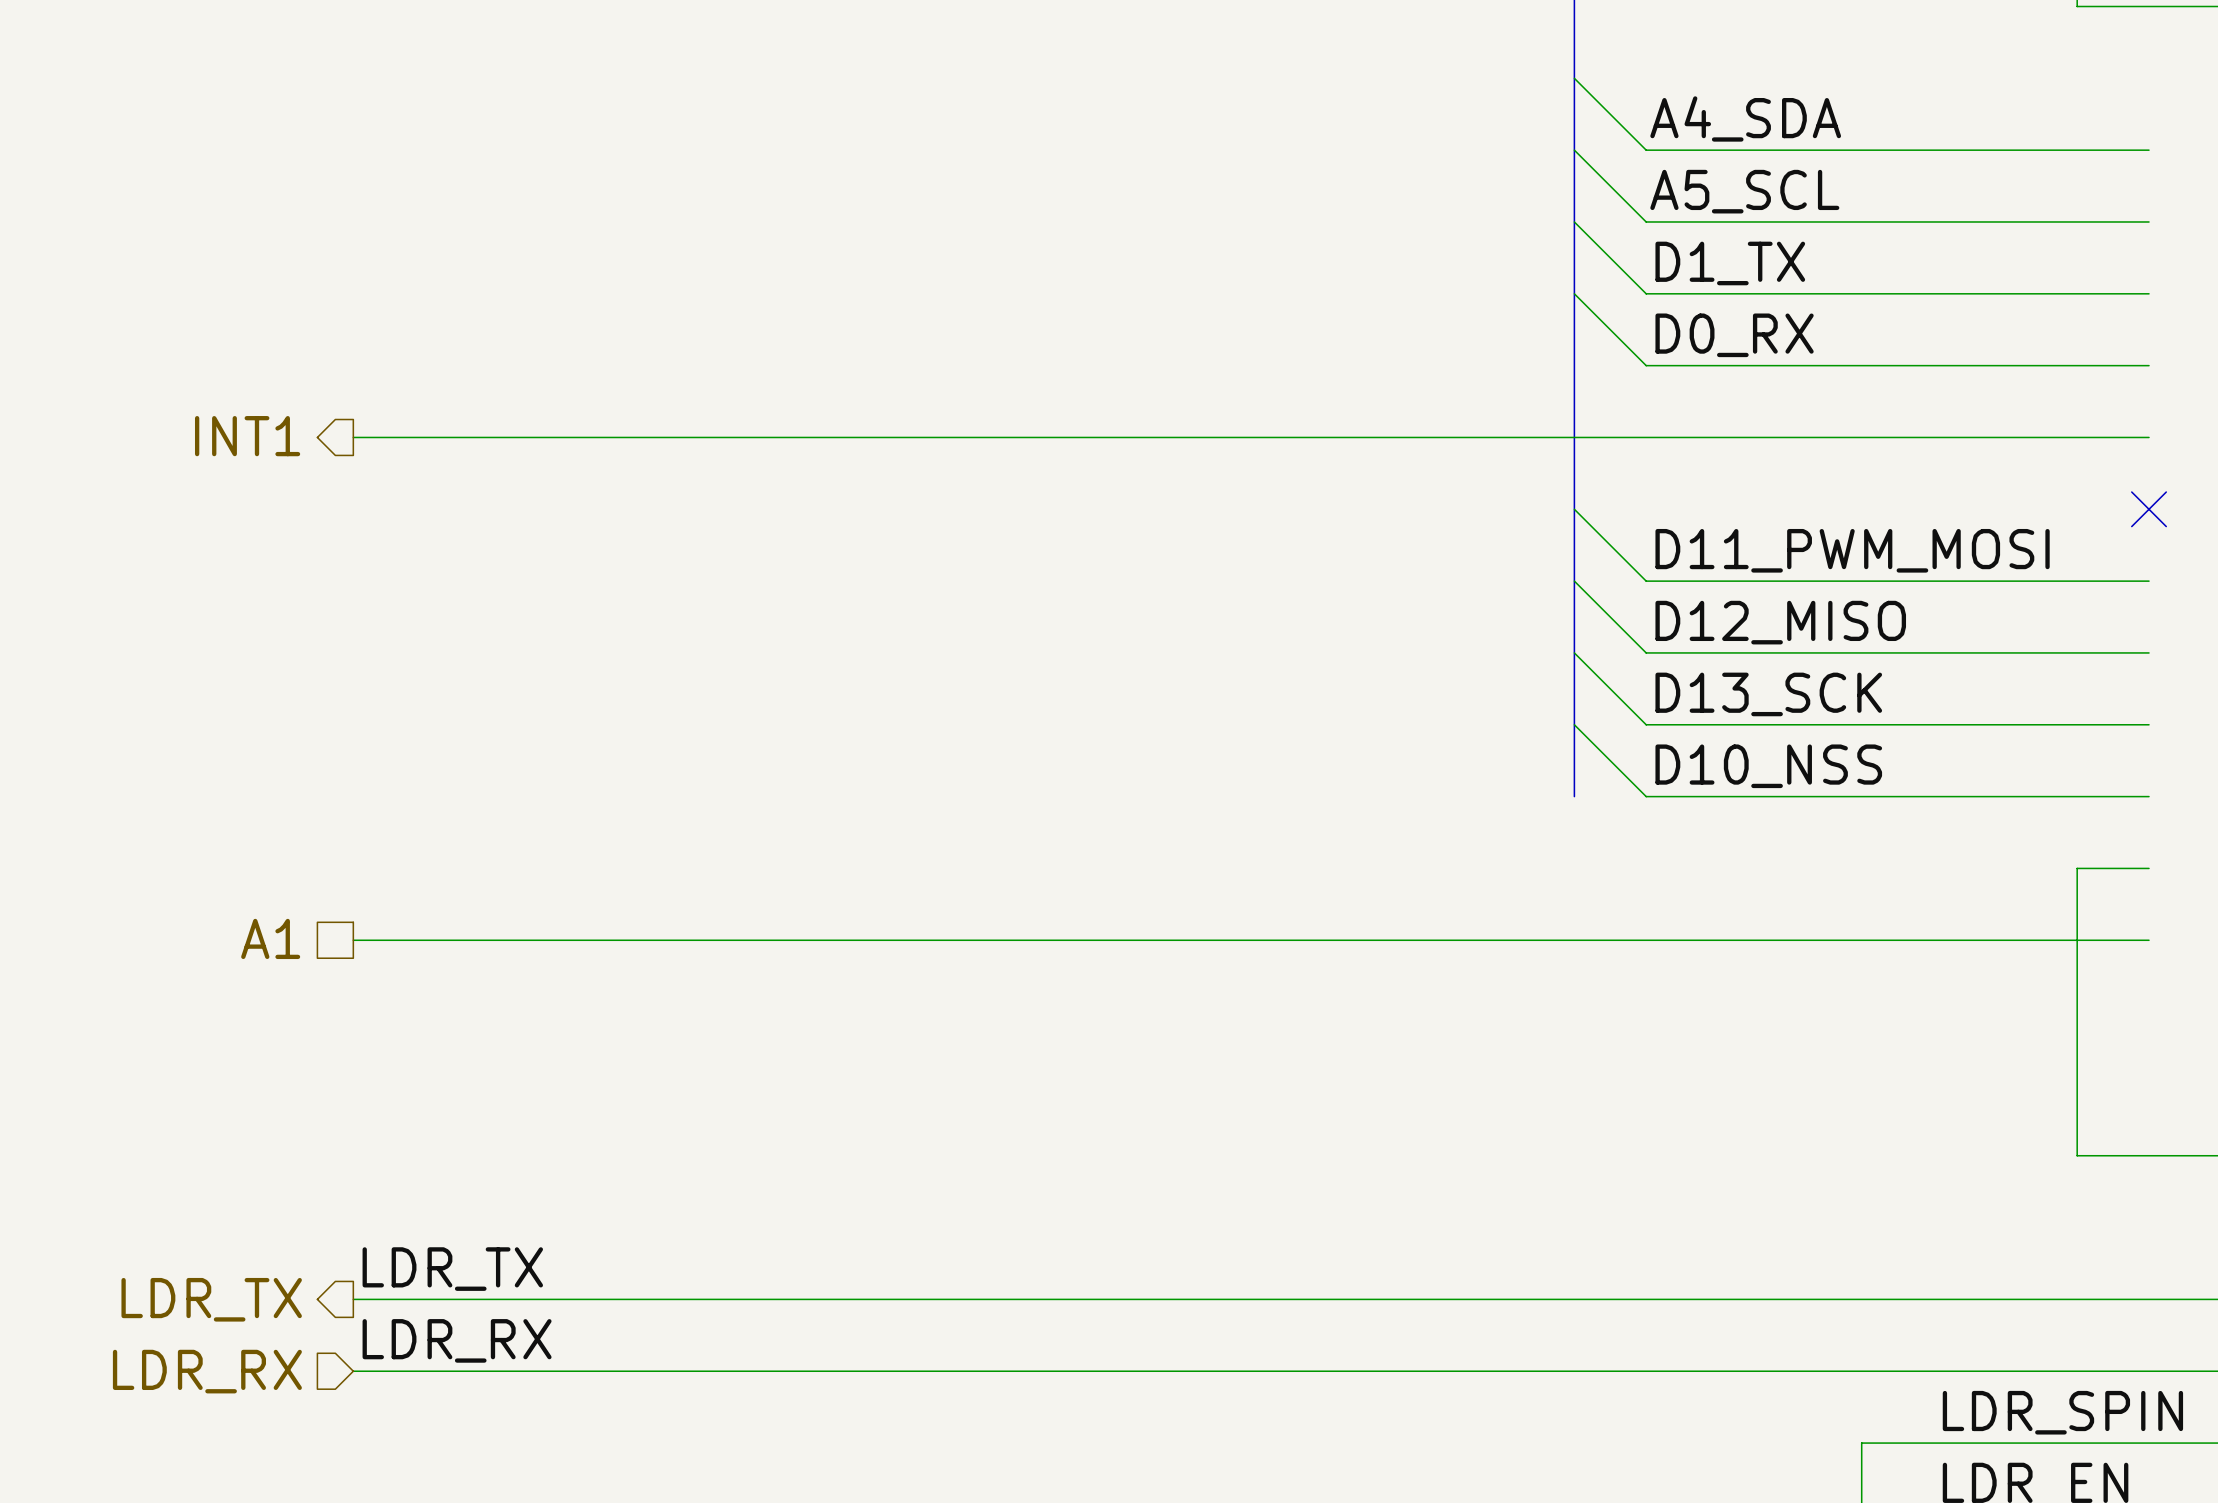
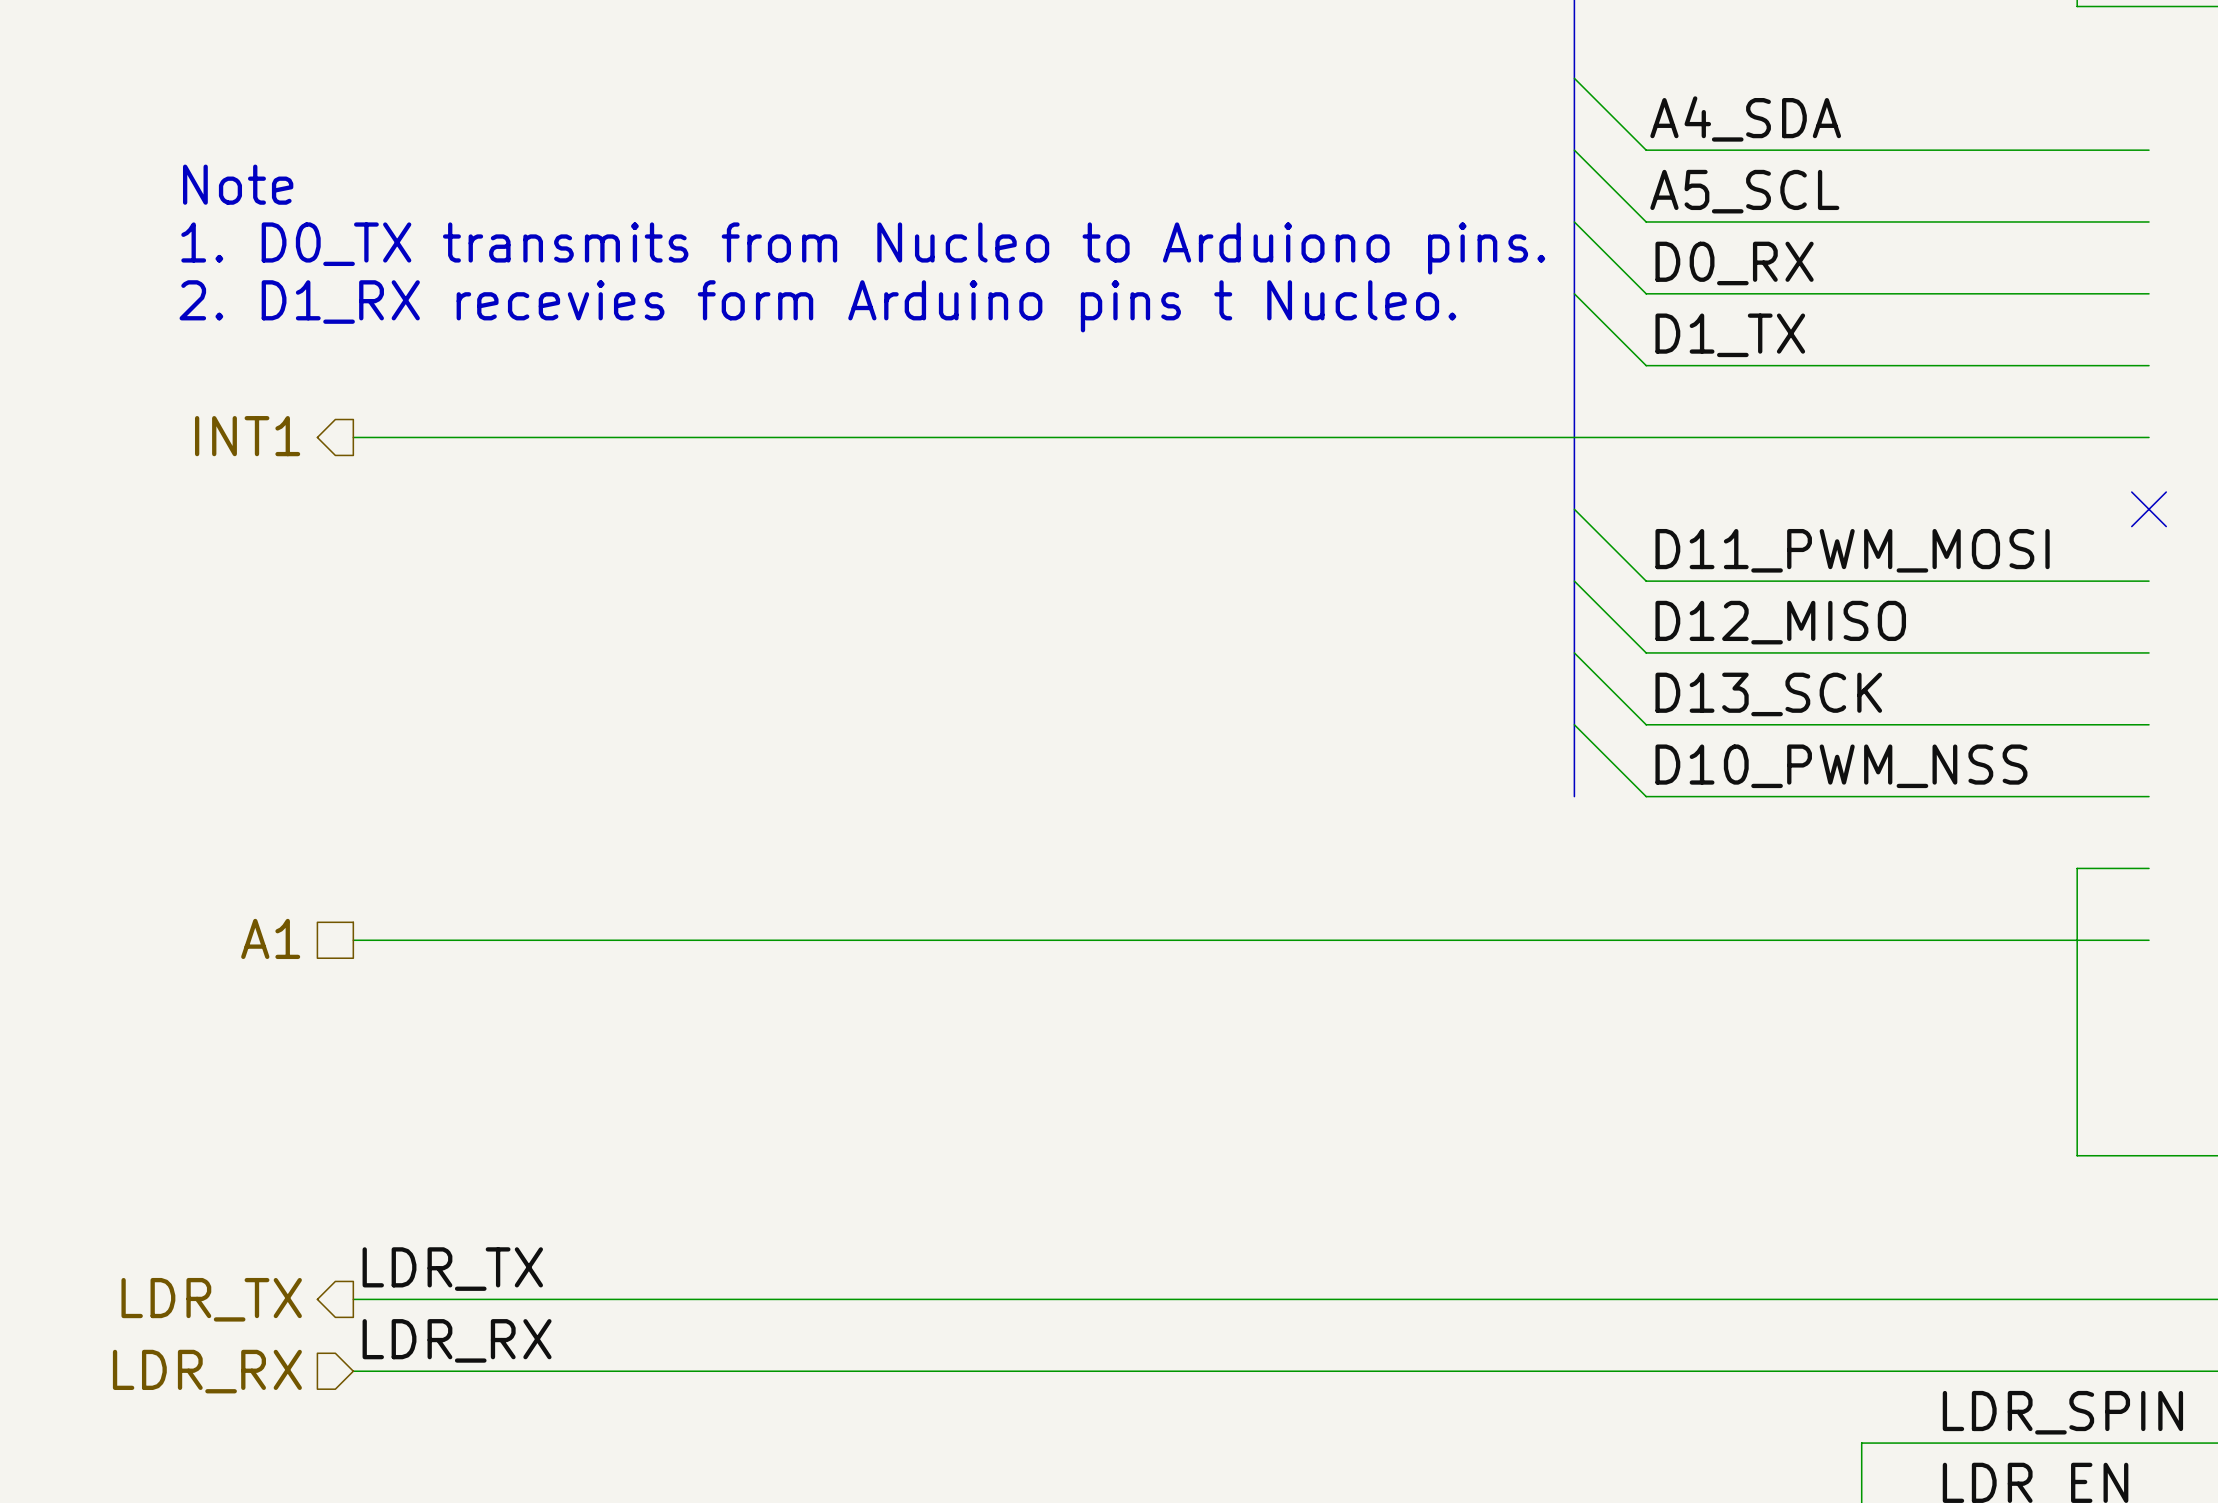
text: none -> Note (238, 184)
text: none -> 1. D0_TX transmits from Nucleo to Arduiono pins. (863, 248)
label: D1_TX (1730, 263) -> D0_RX (1734, 263)
text: none -> 2. D1_RX recevies form Arduino pins t Nucleo. (817, 306)
label: D0_RX (1734, 335) -> D1_TX (1730, 335)
label: D10_NSS (1768, 766) -> D10_PWM_NSS (1841, 766)

